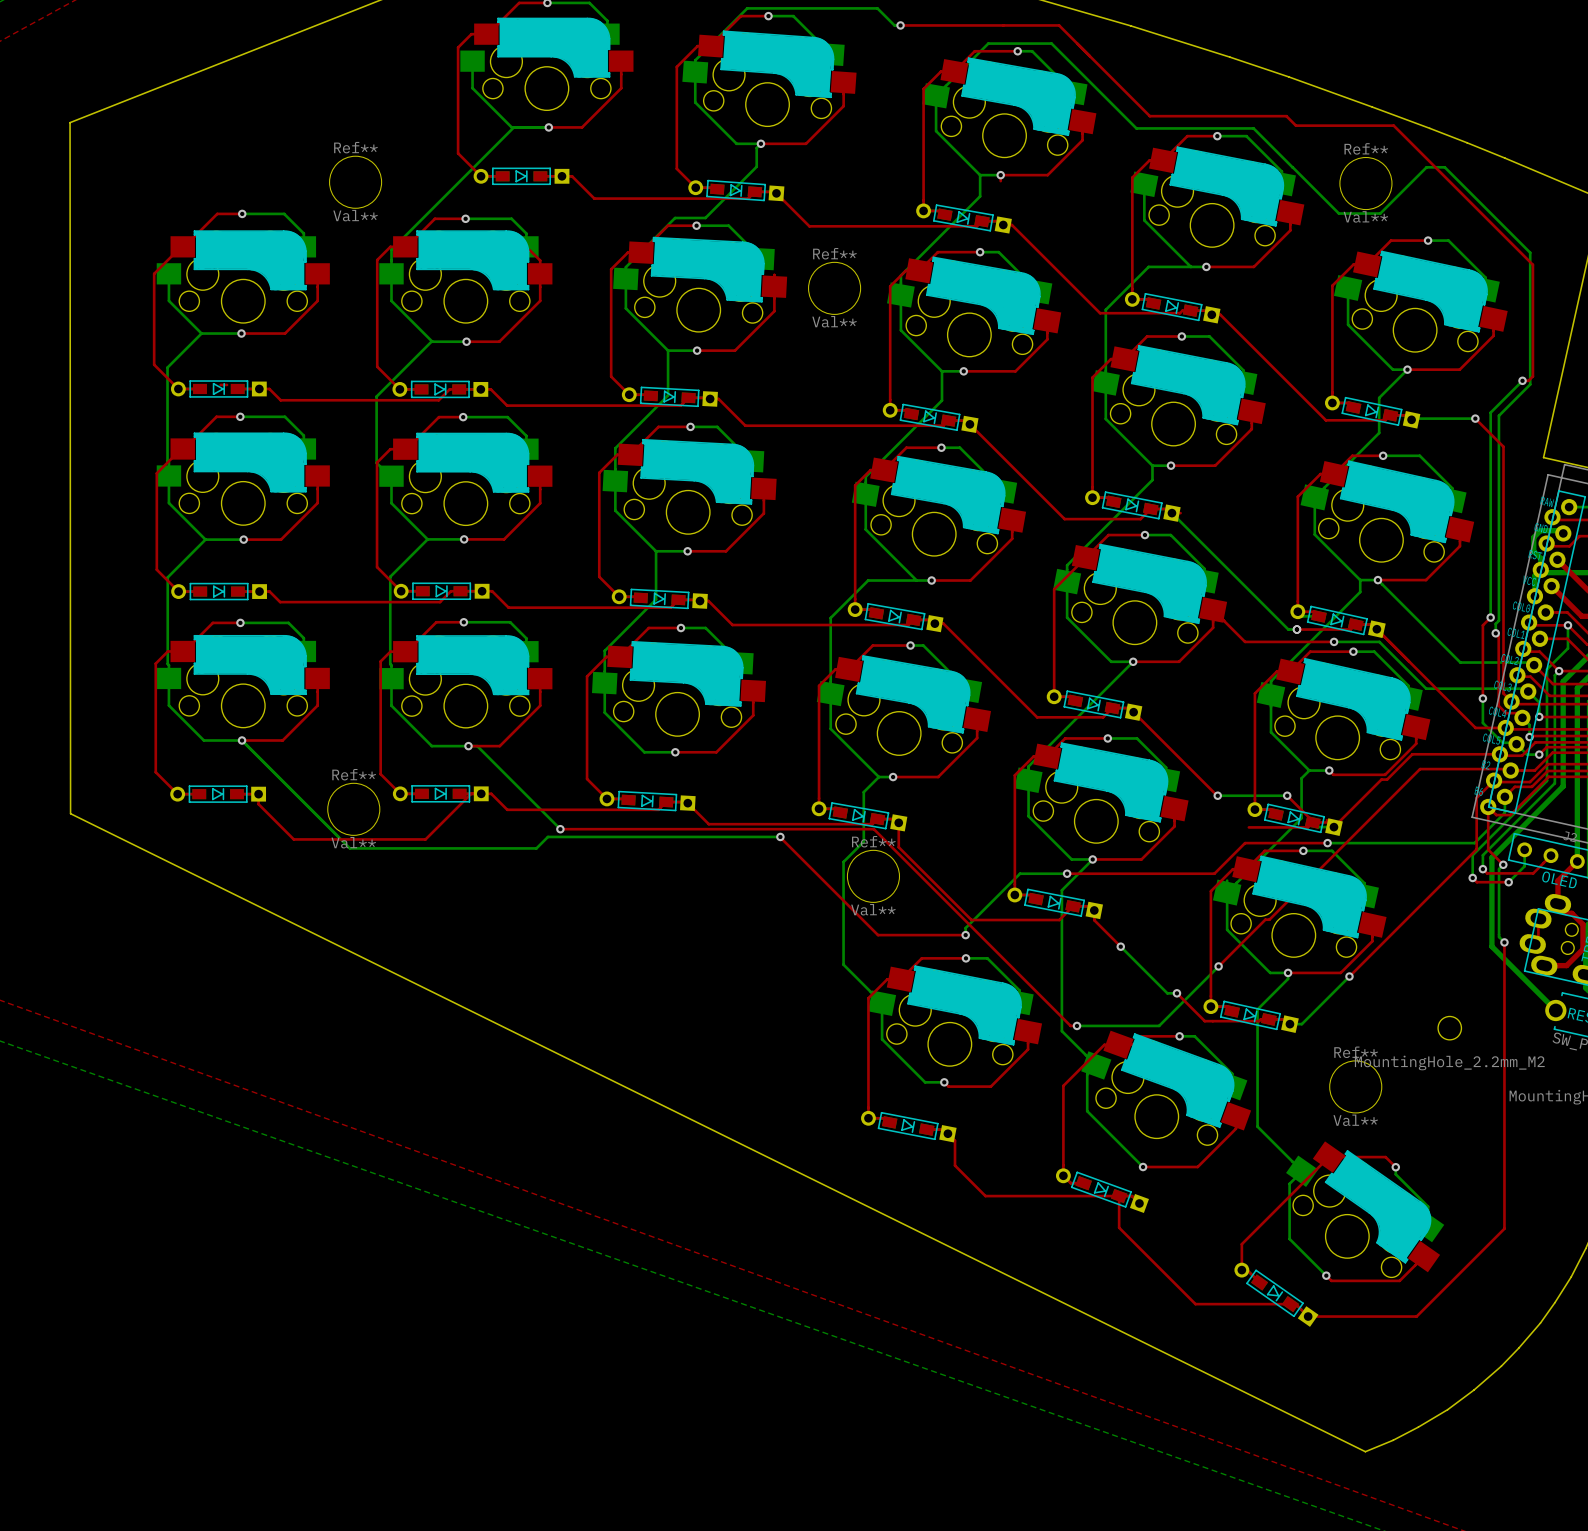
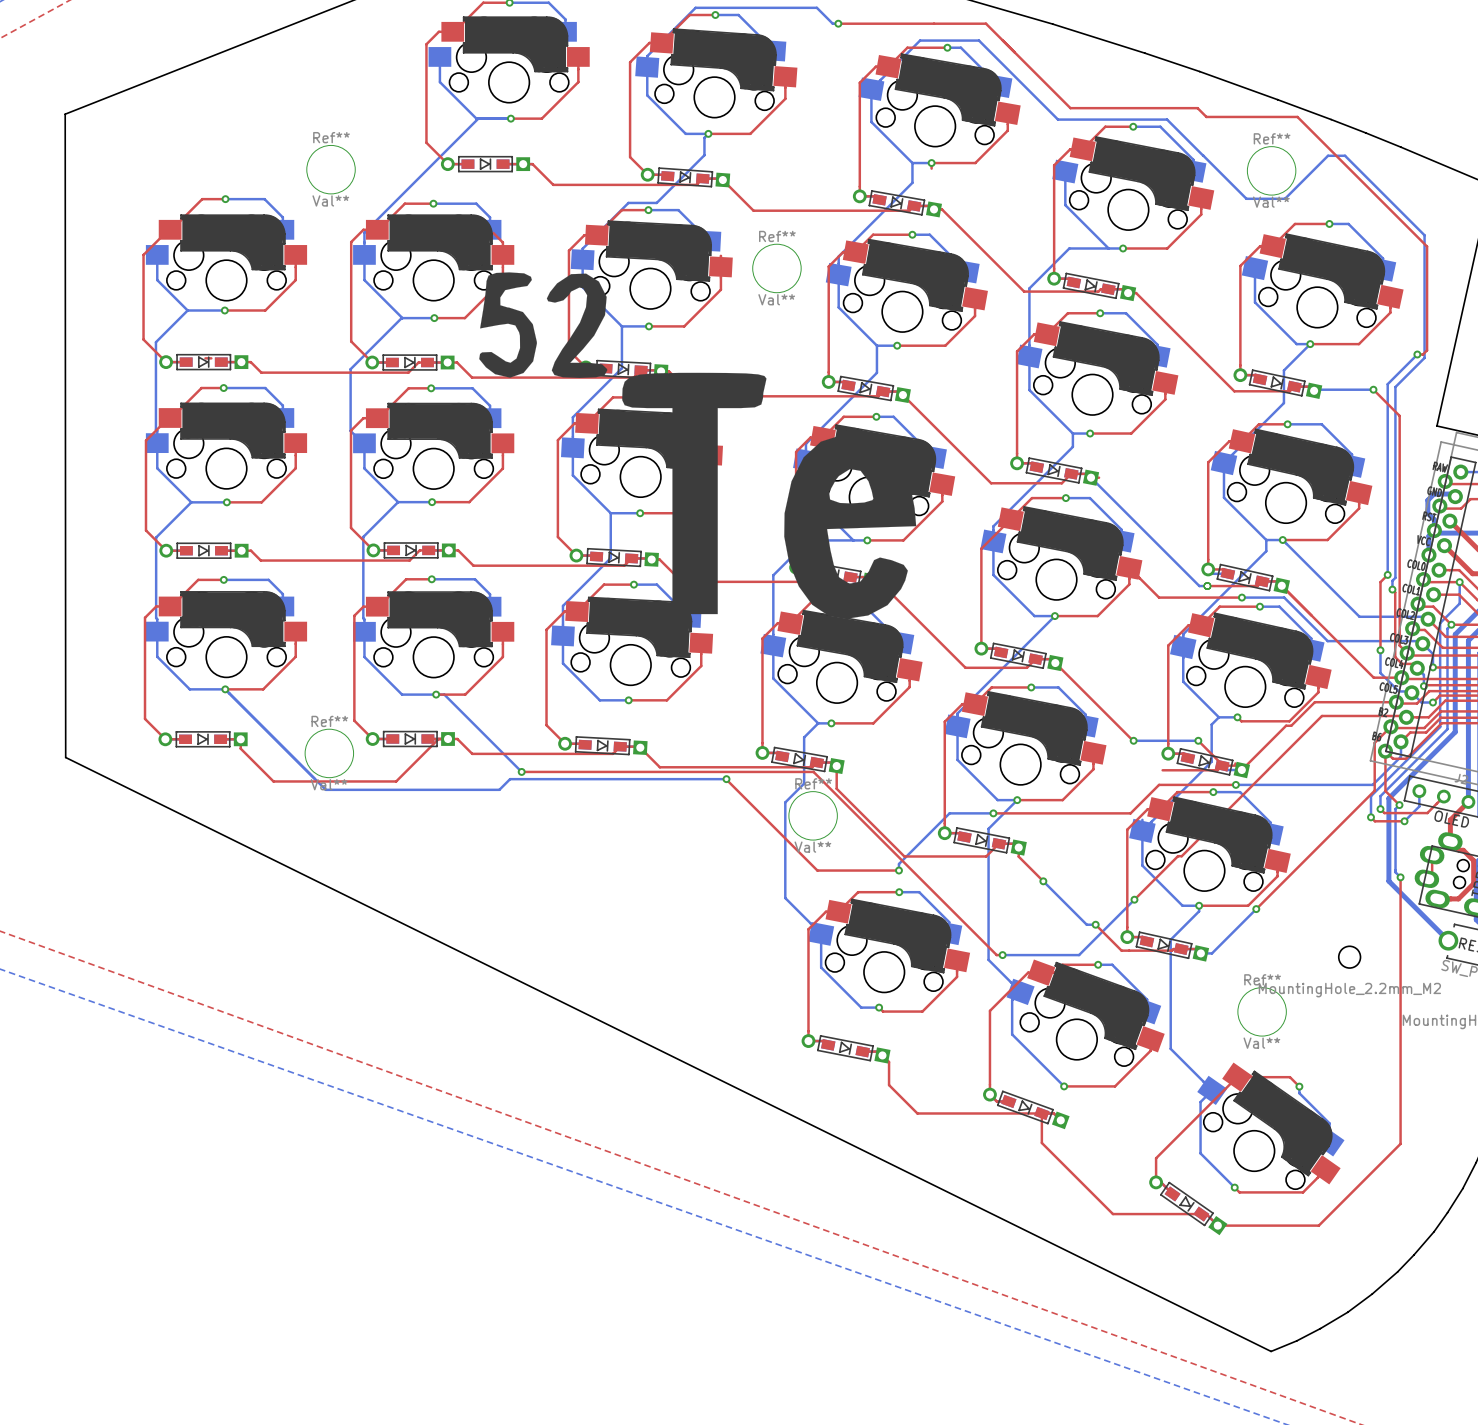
drawing: none -> [479, 272, 917, 619]

